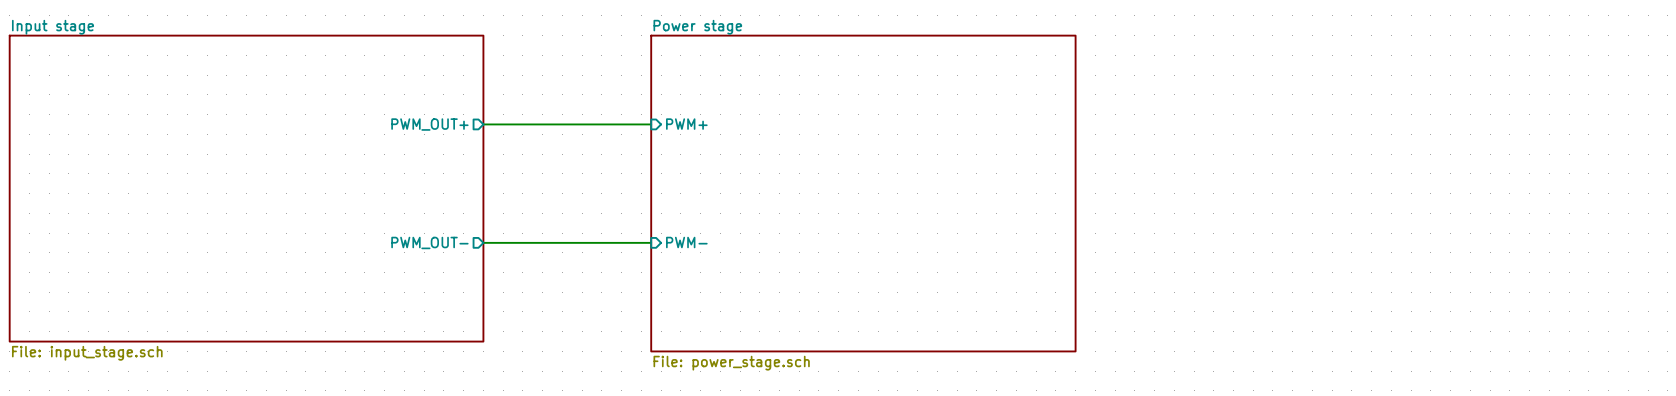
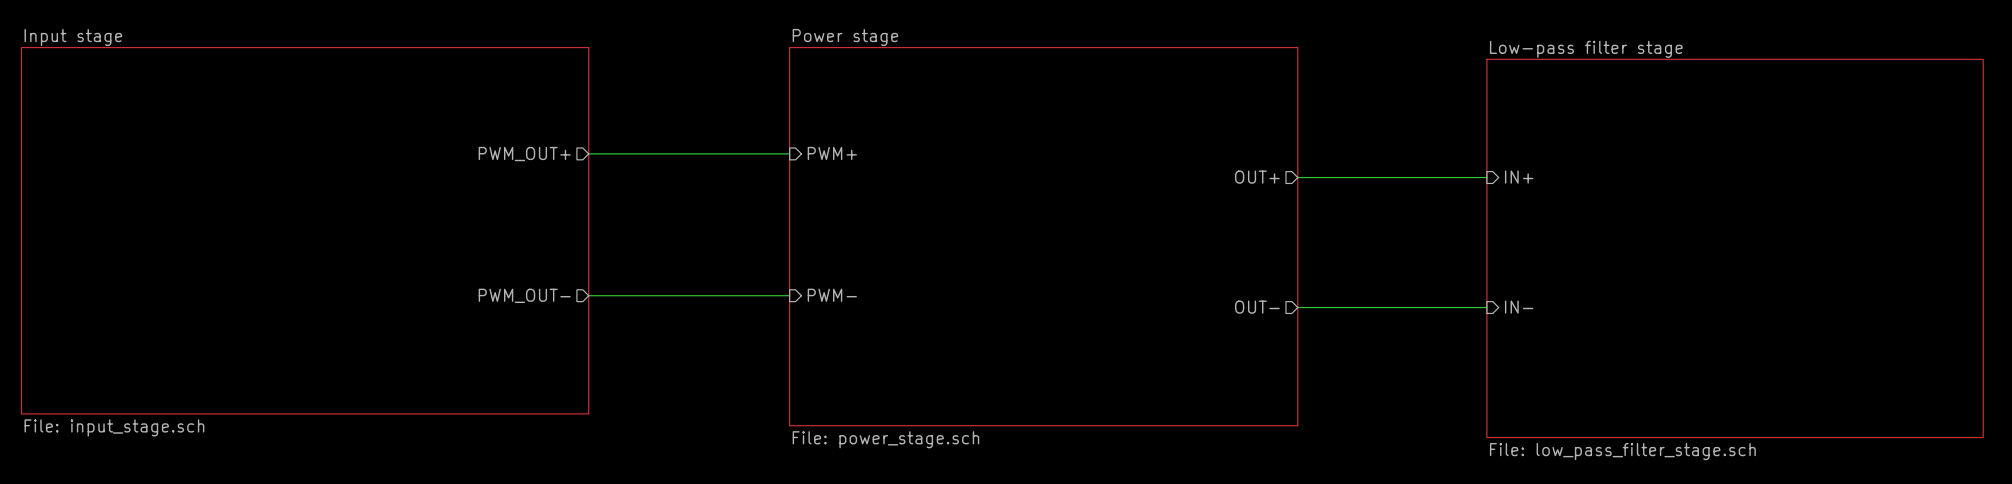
sheet pin: none -> OUT+ (1257, 177)
sheet pin: none -> IN+ (1519, 177)
wire: none -> (1297, 177) (1486, 177)
sheet Low-pass filter stage: none -> File: low_pass_filter_stage.sch (1735, 248)
sheet pin: none -> OUT- (1257, 307)
wire: none -> (1297, 307) (1486, 307)
sheet pin: none -> IN- (1519, 307)

